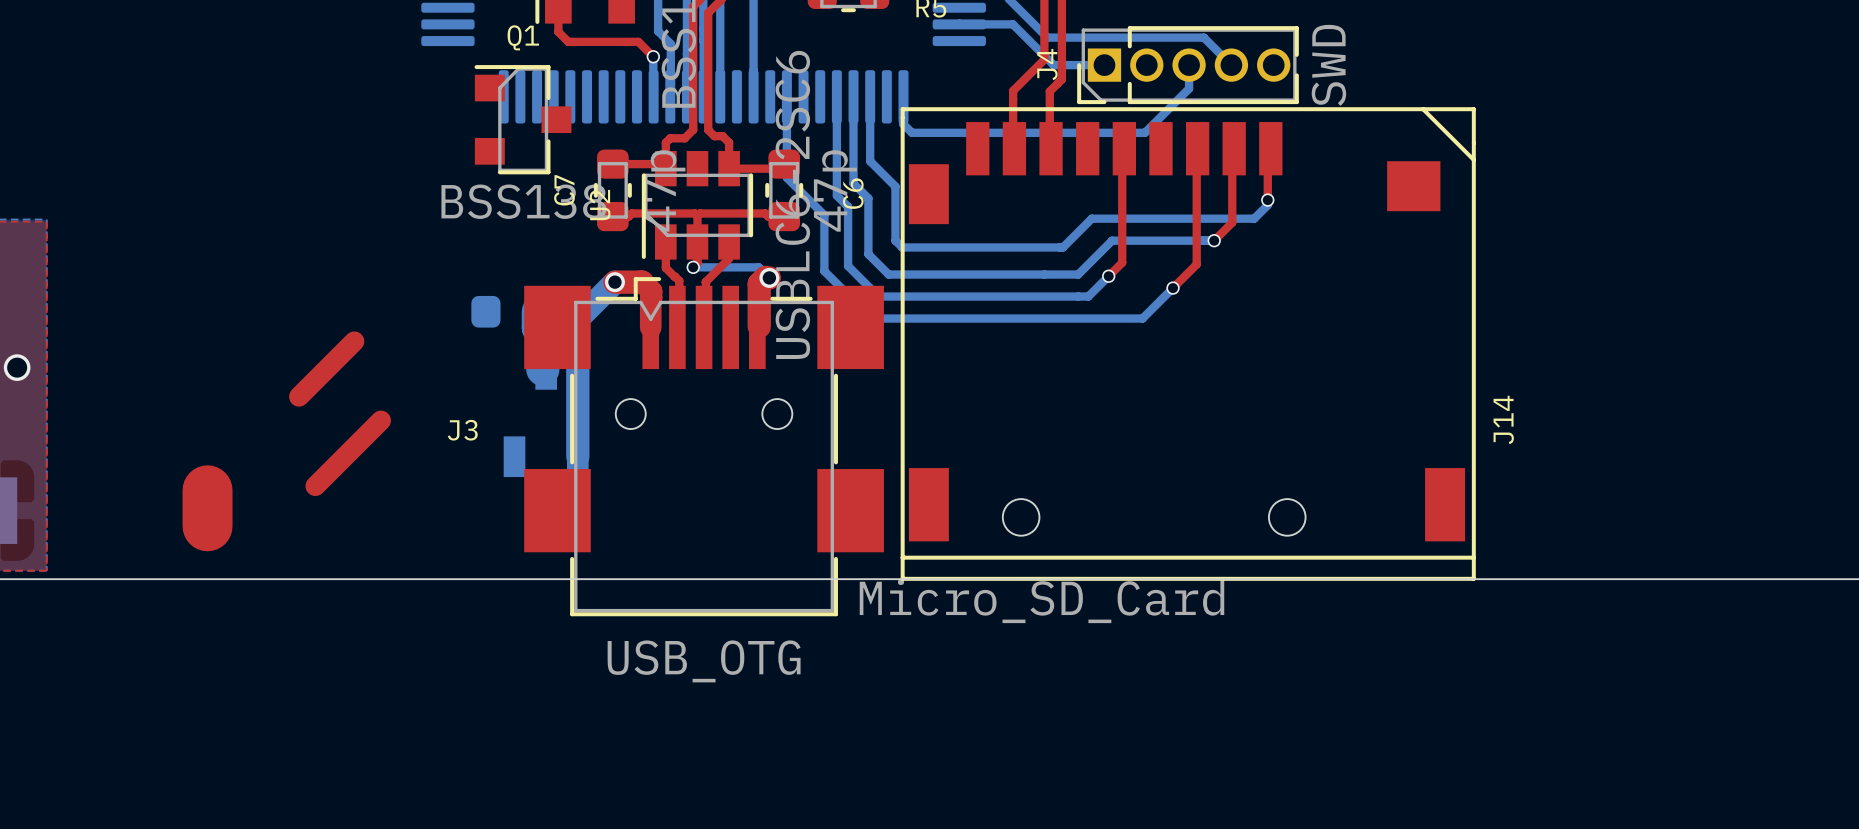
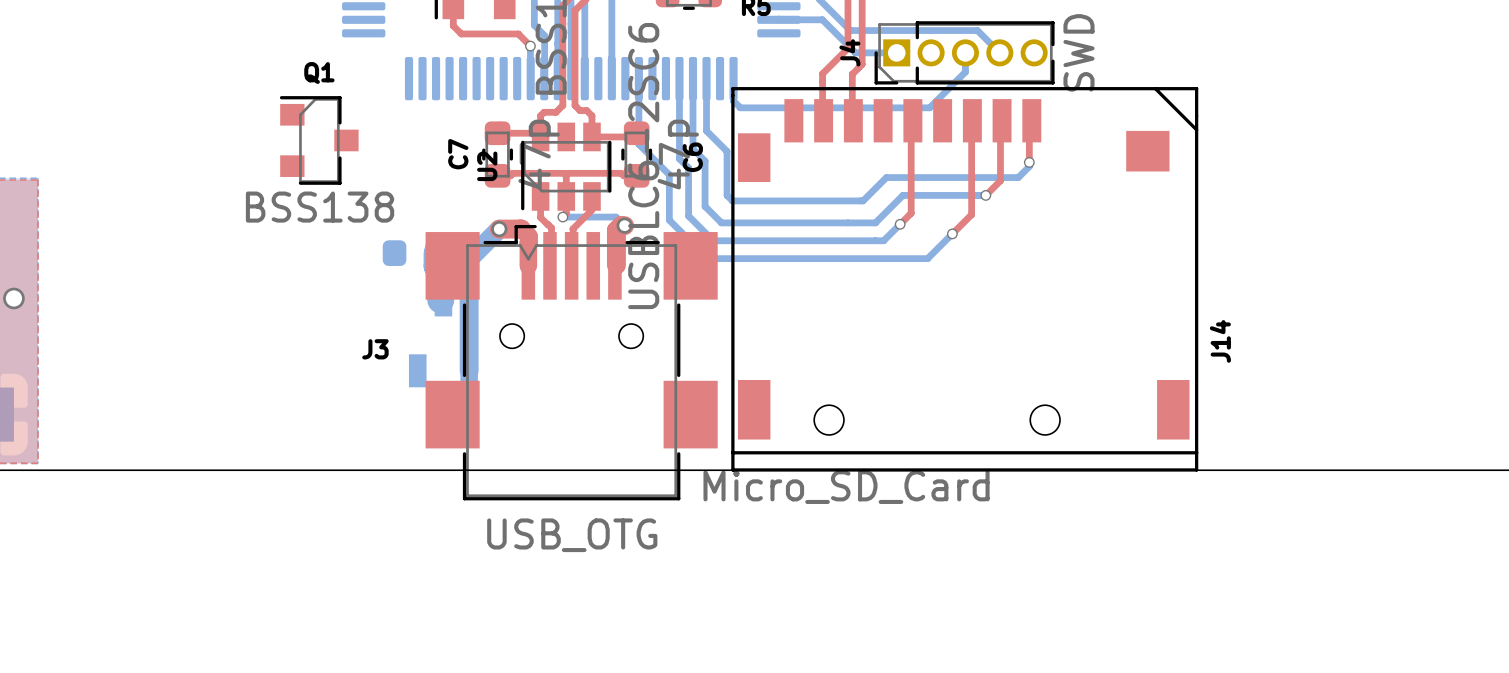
Q1 position: (522, 119) -> (319, 140)
top track: (354, 341) (299, 396) -> none
top track: (381, 420) (315, 486) -> none
top track: (207, 490) (207, 526) -> none

